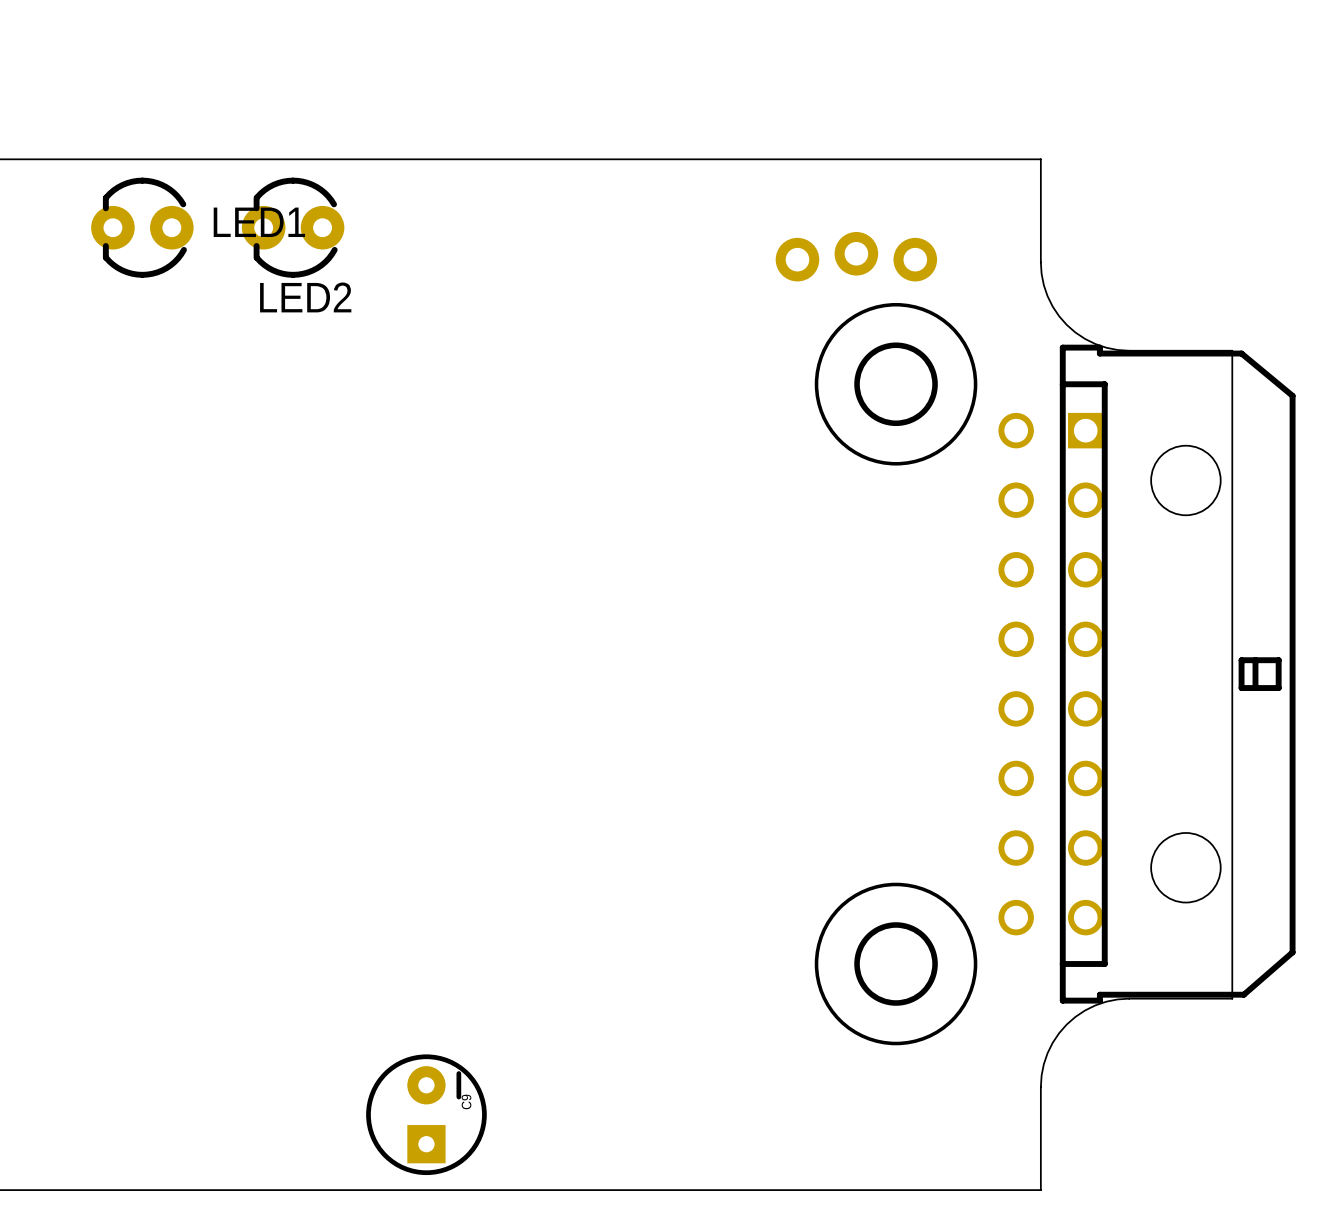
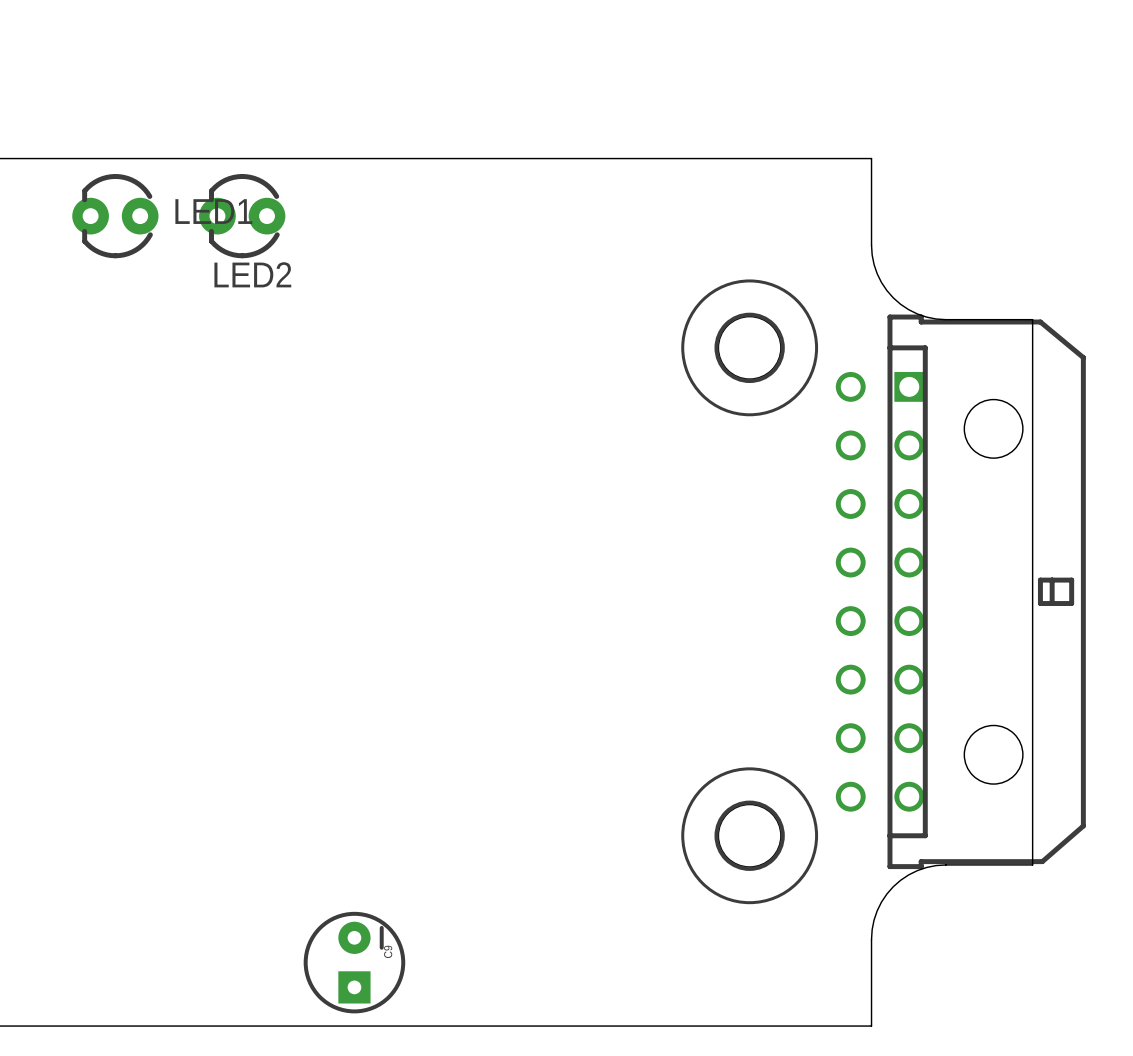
part: (856, 256) -> none

